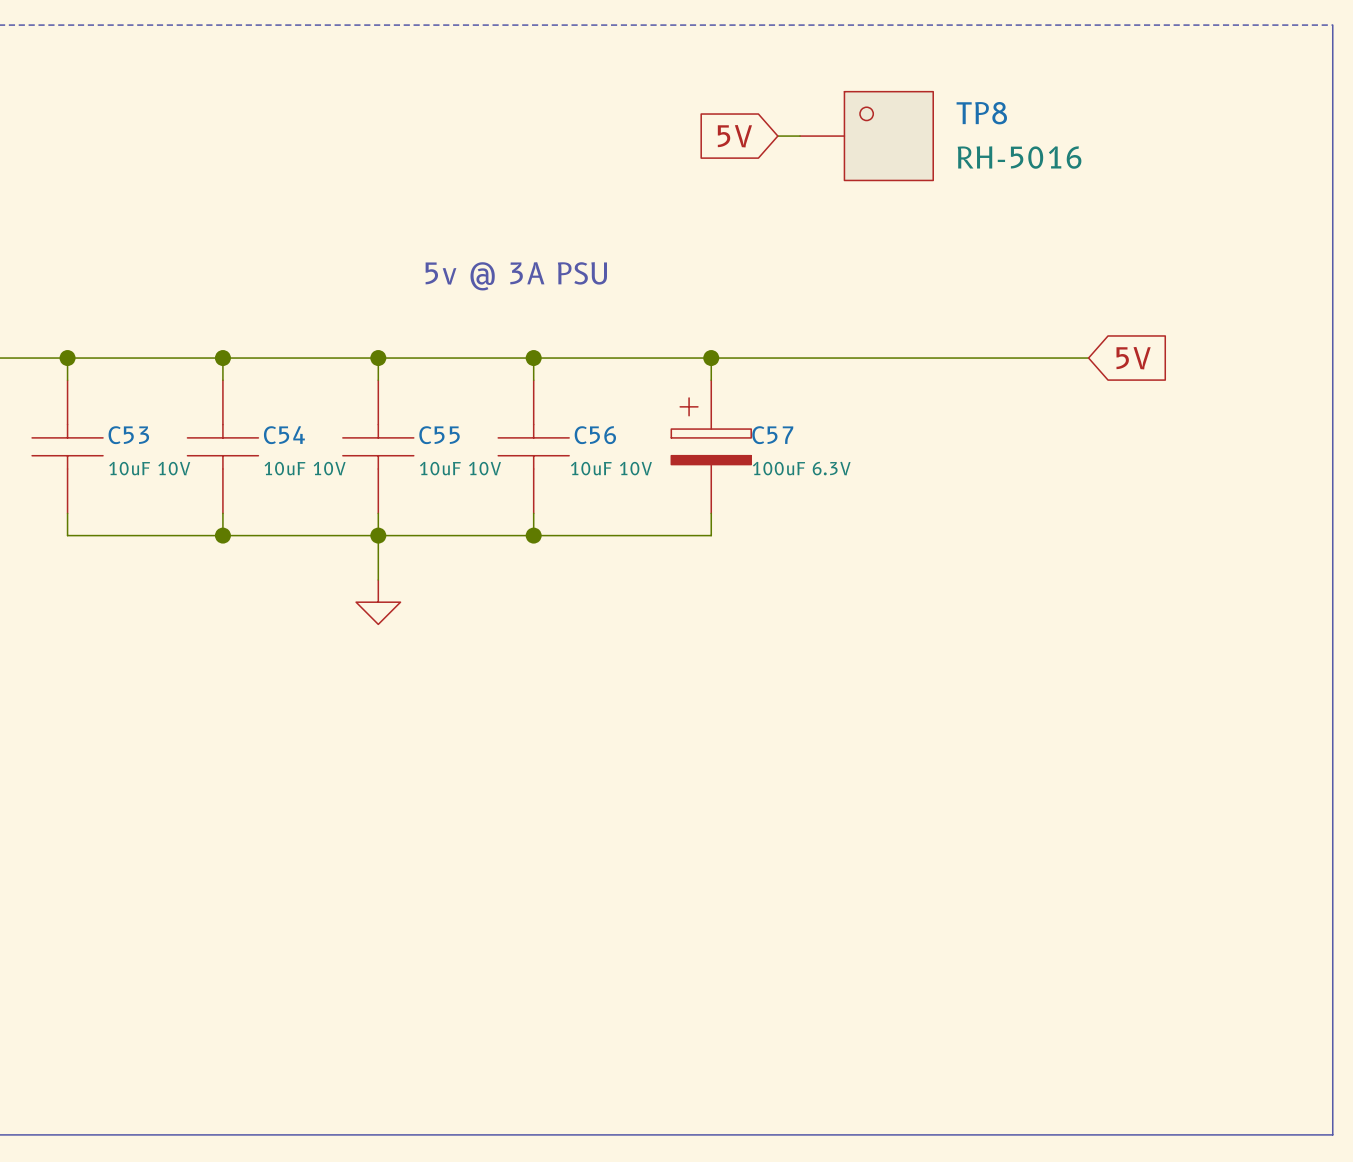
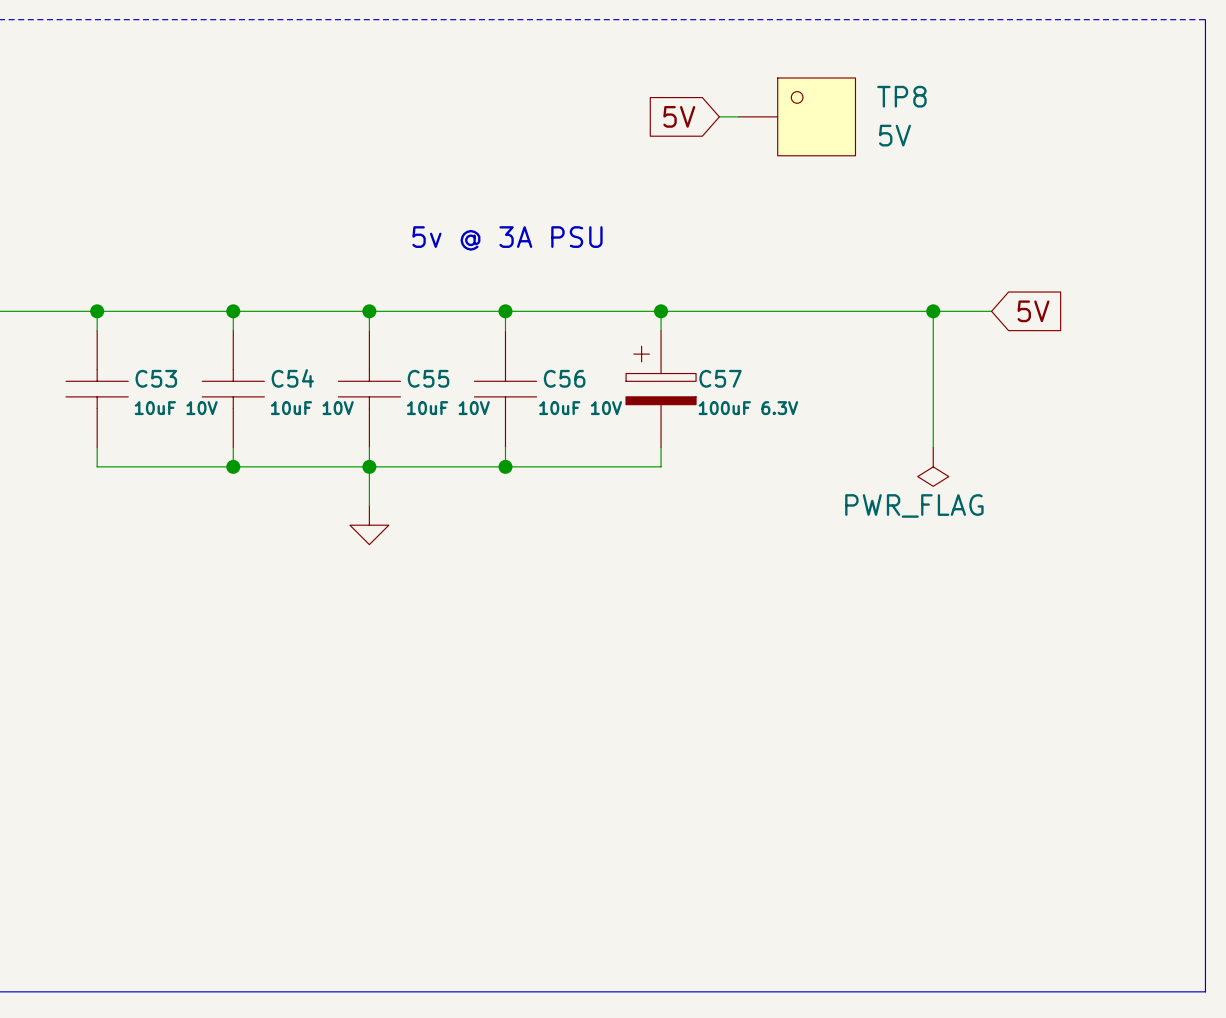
TP8 value: RH-5016 (1019, 157) -> 5V (894, 135)
wire: none -> (933, 311) (933, 447)
junction: none -> (933, 311)
power symbol: none -> PWR_FLAG (933, 466)

